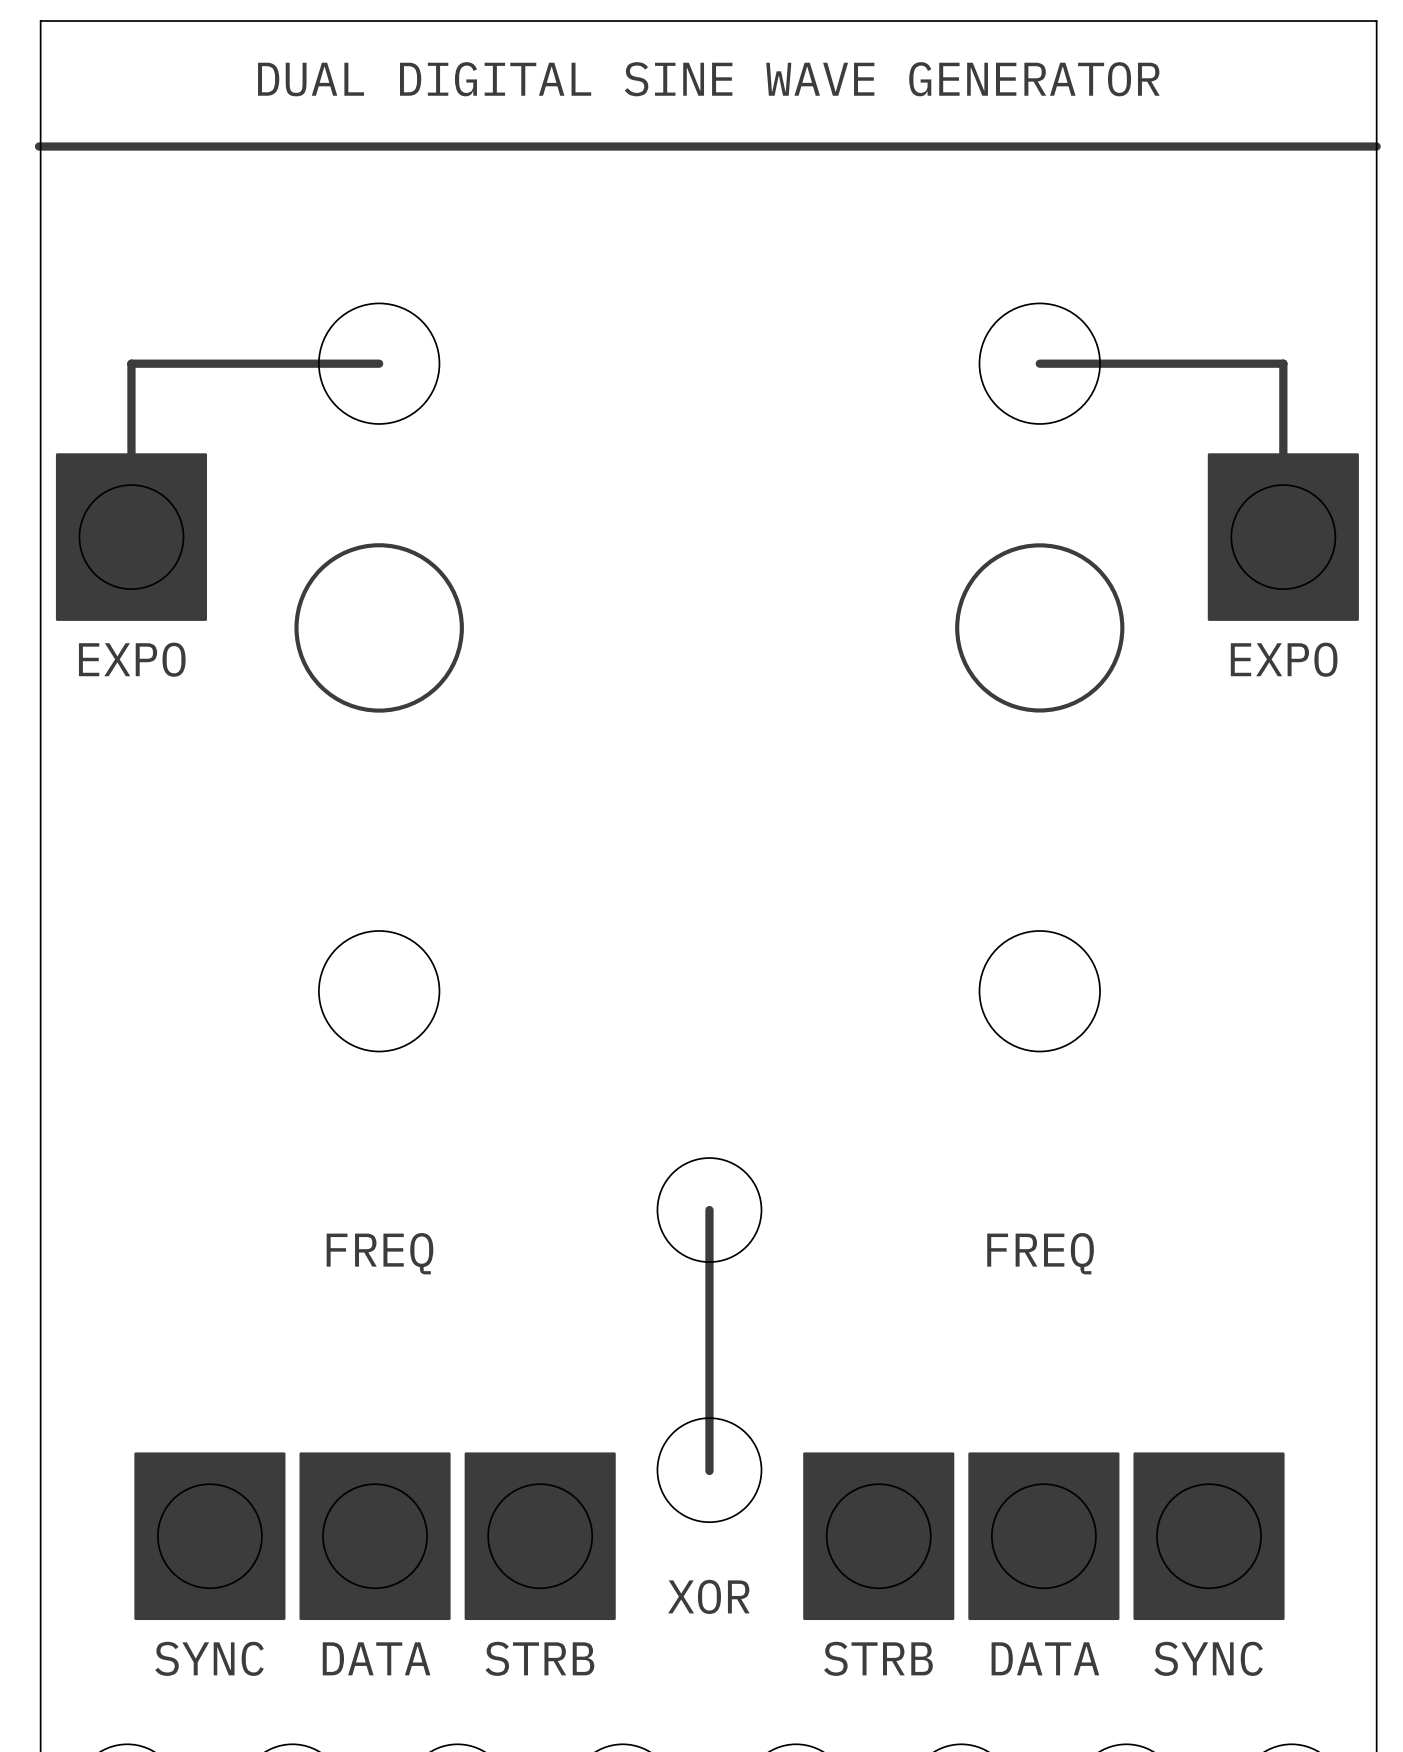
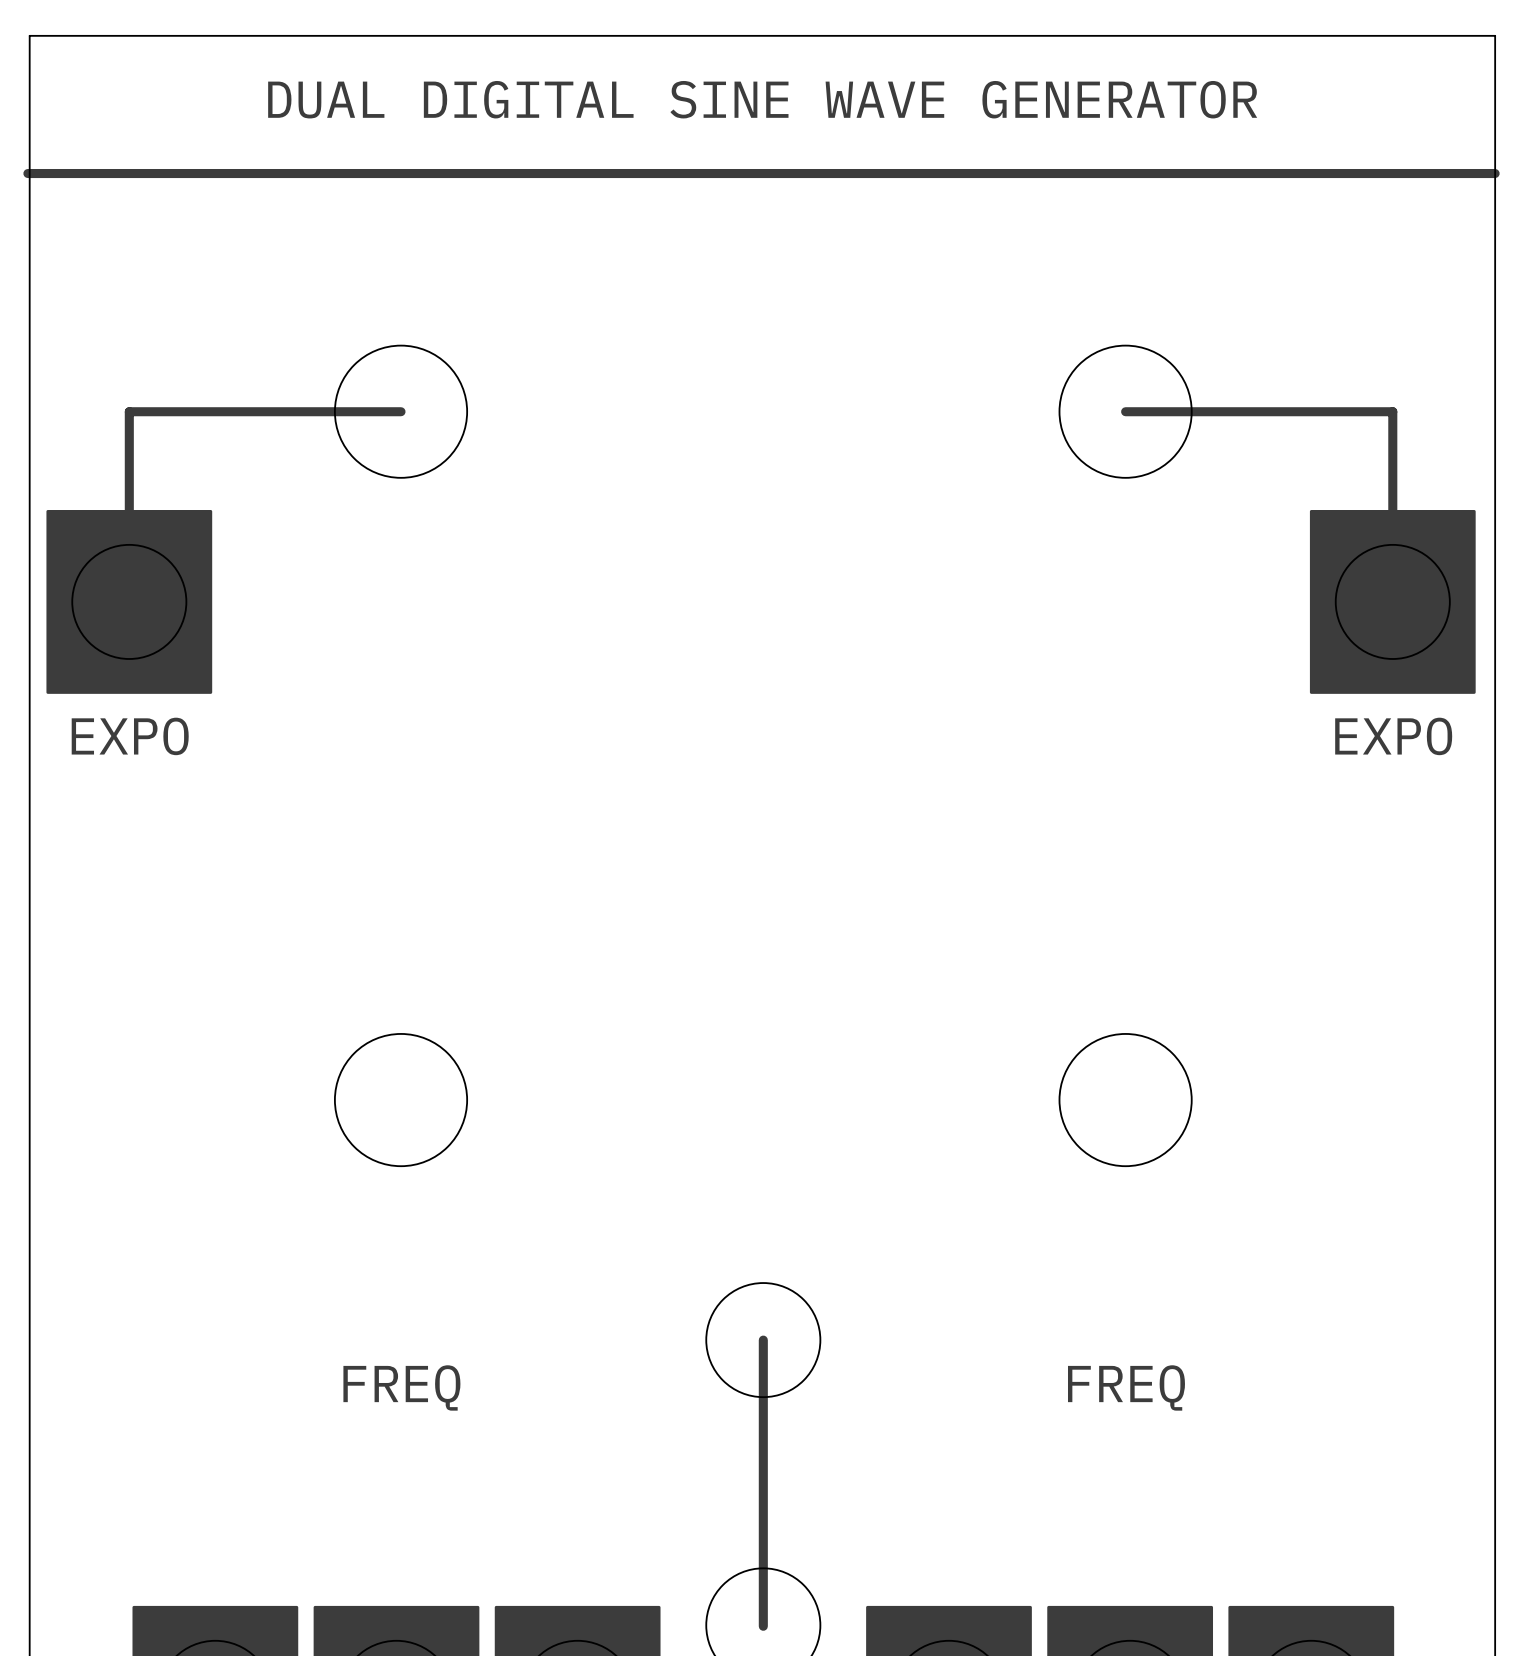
drawing: [294, 543, 464, 713] -> none
drawing: [955, 543, 1125, 713] -> none

